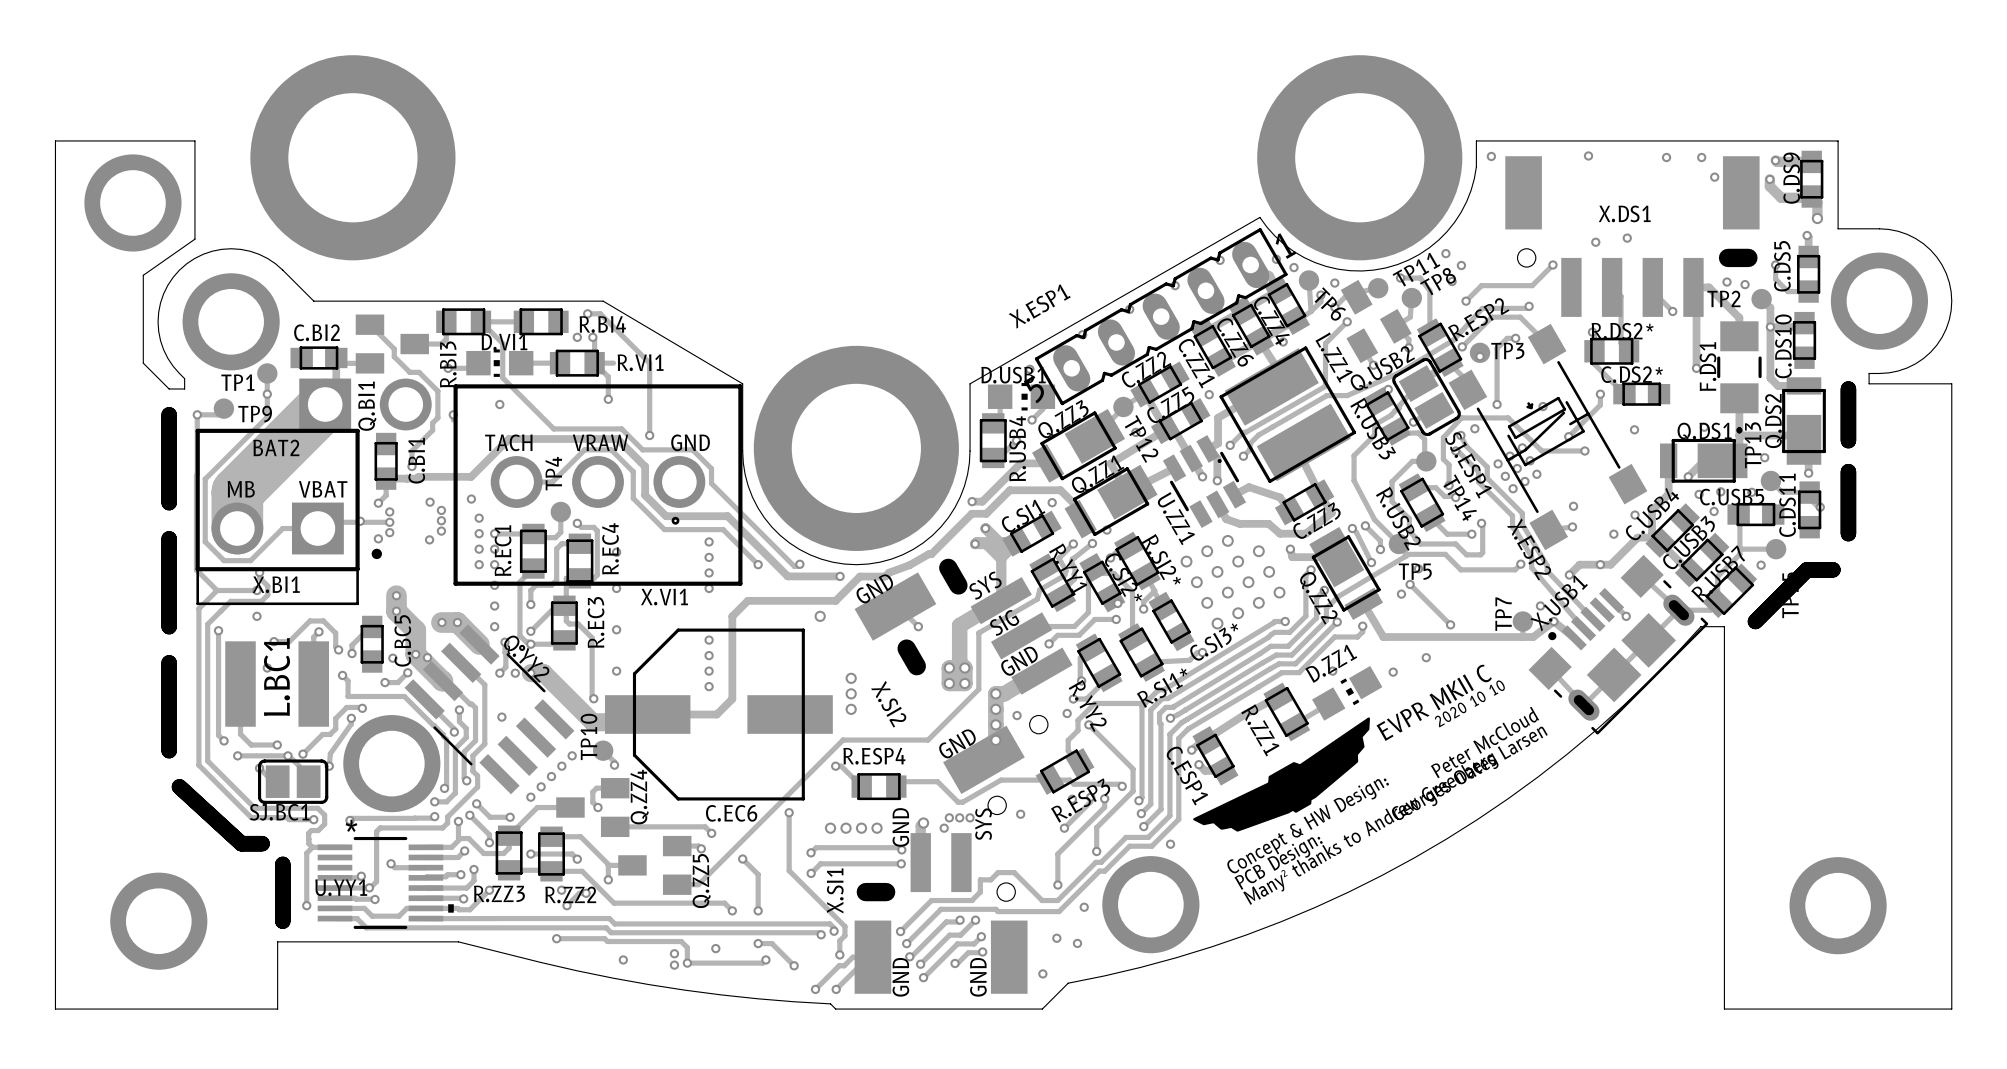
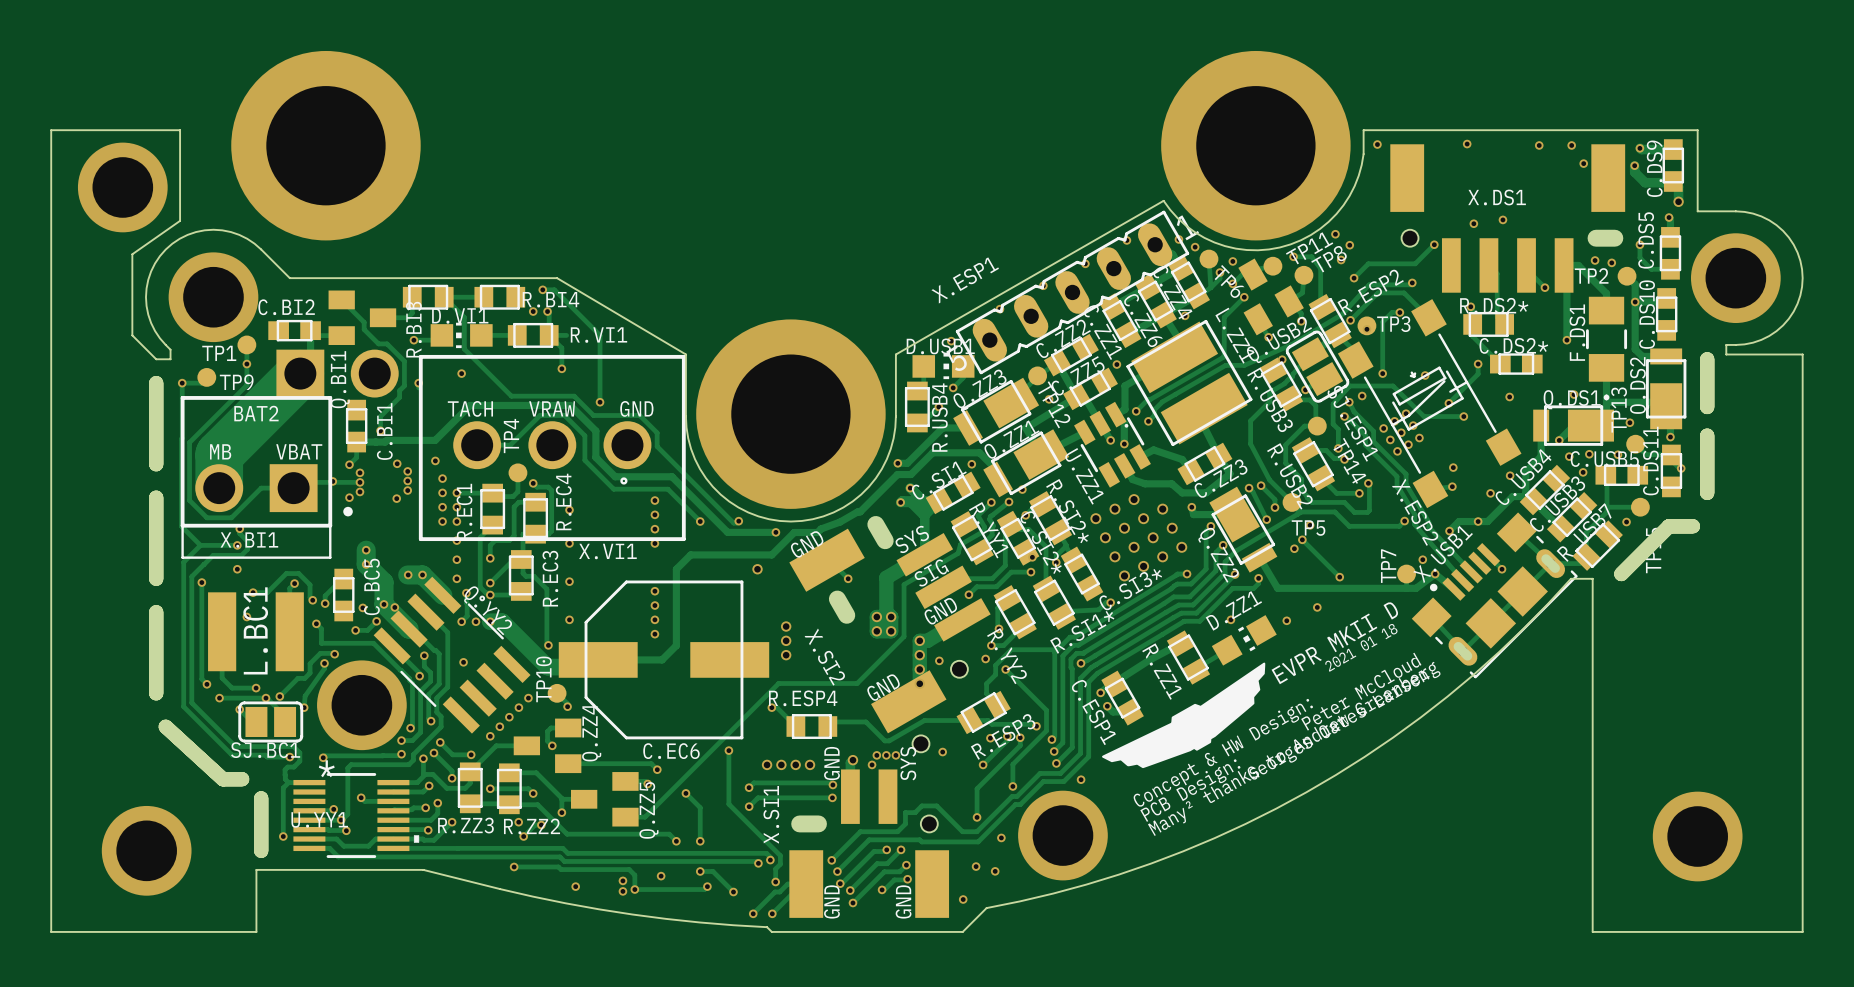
text: EVPR MKII C (1434, 702) -> EVPR MKII D (1334, 642)
text: 2020 10 10 (1469, 703) -> 2021 01 18 (1361, 647)

